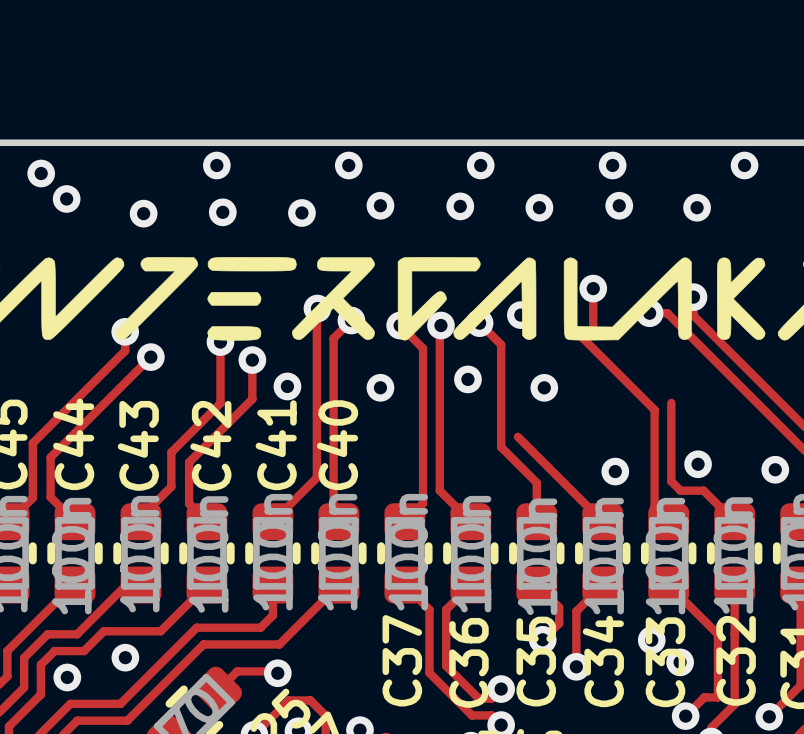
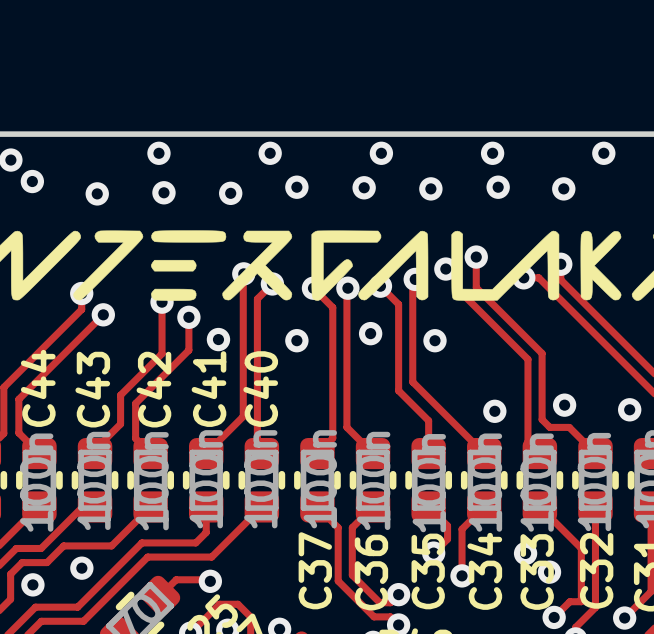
via: none -> (445, 269)
track: none -> (412, 281) (412, 382)
track: none -> (476, 287) (542, 353)

